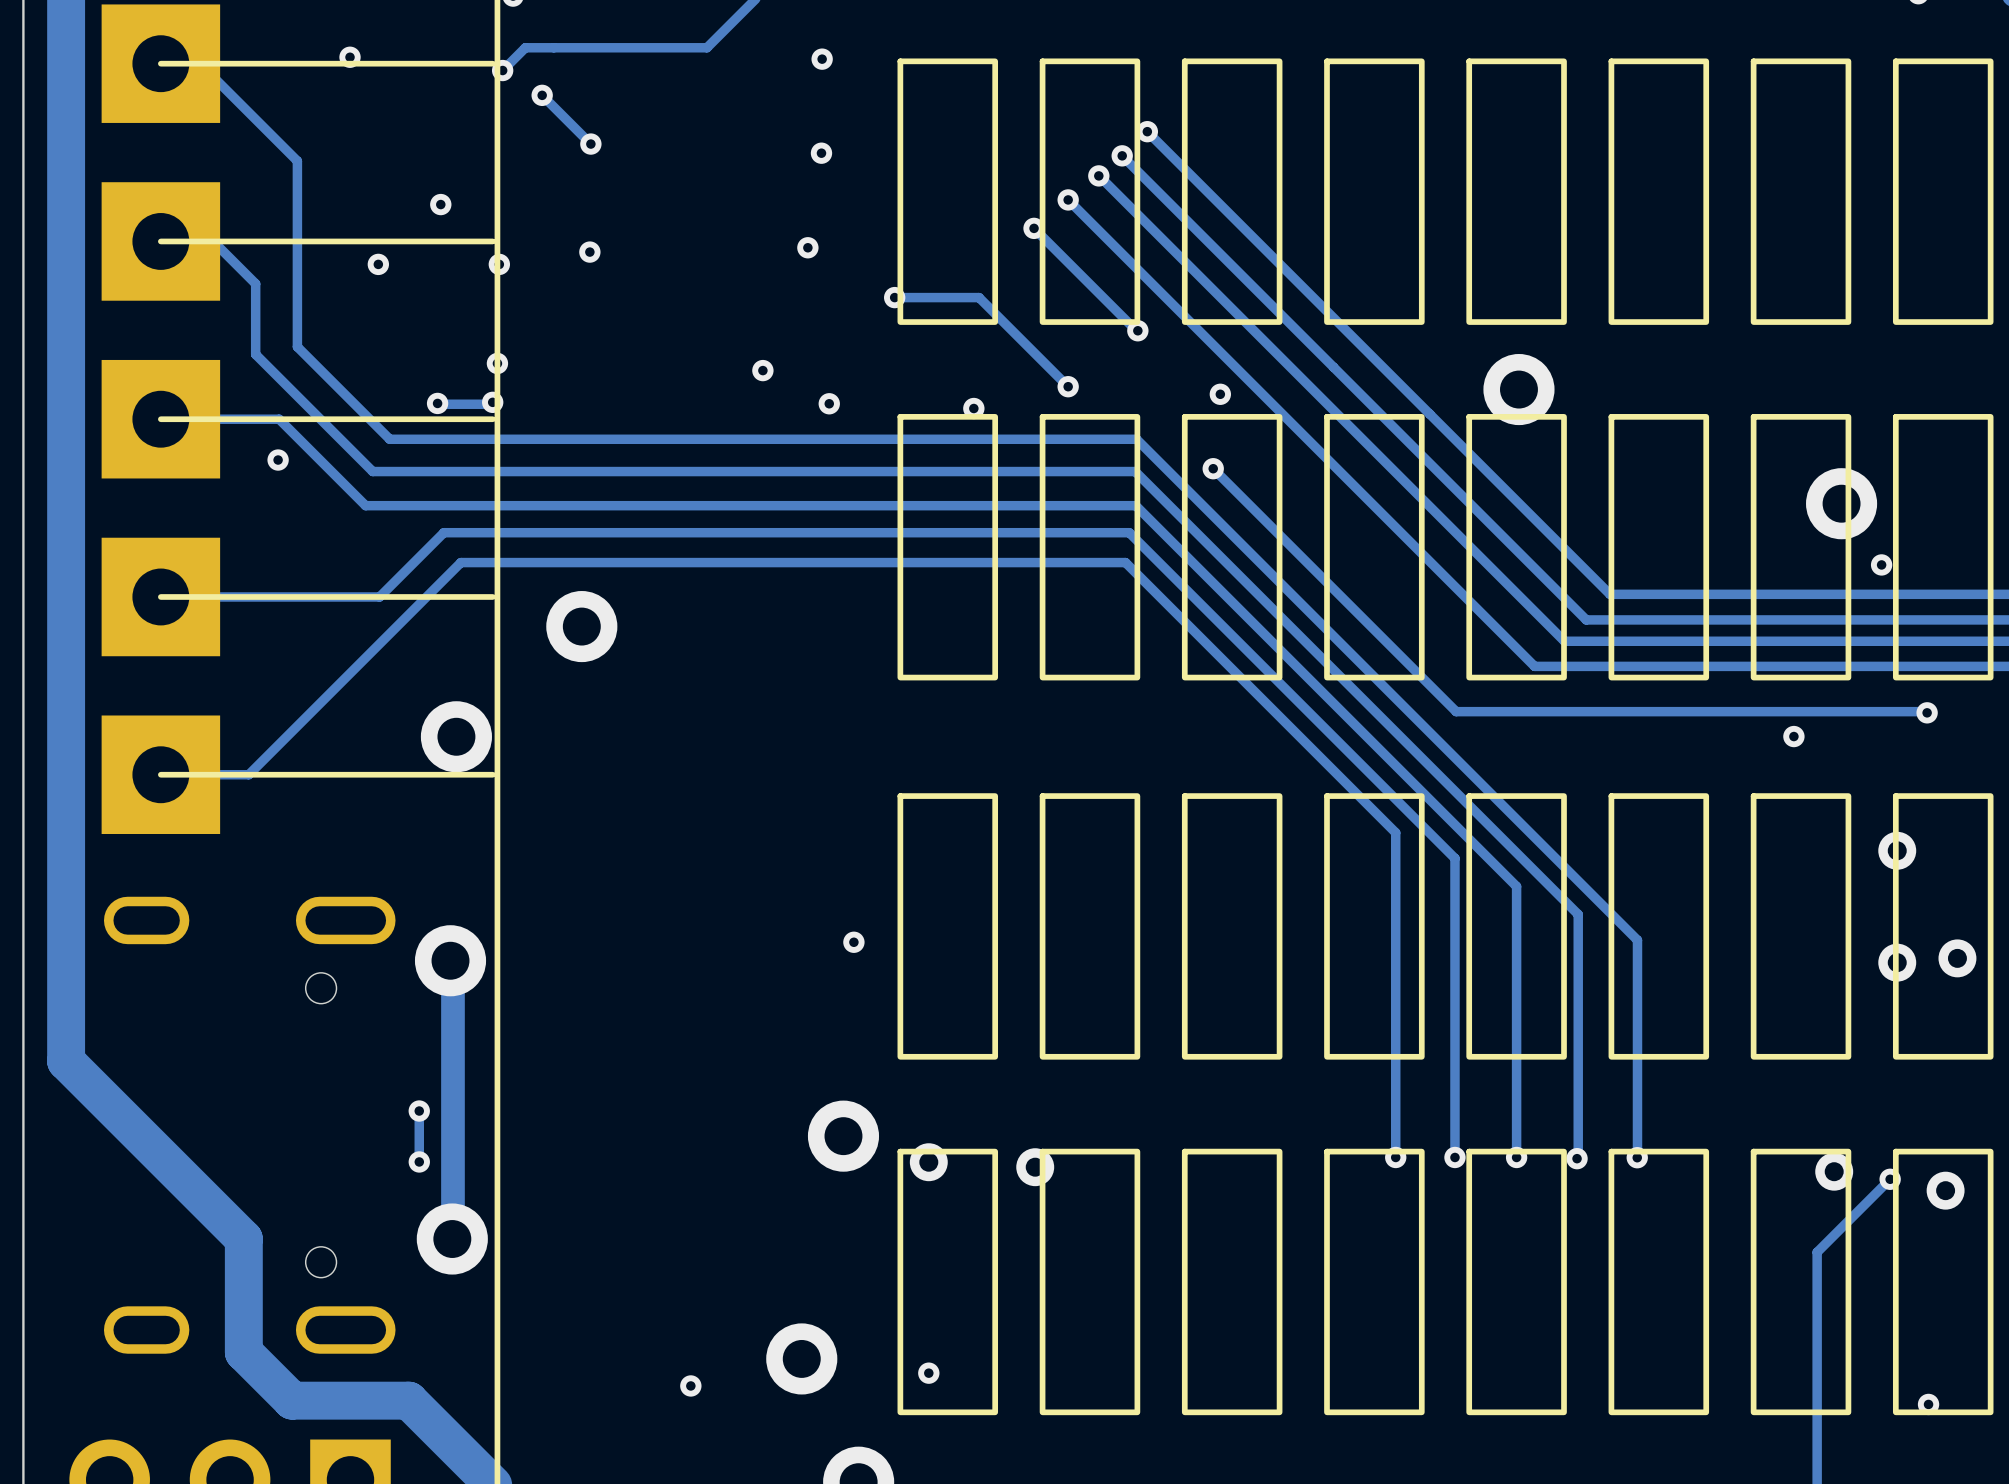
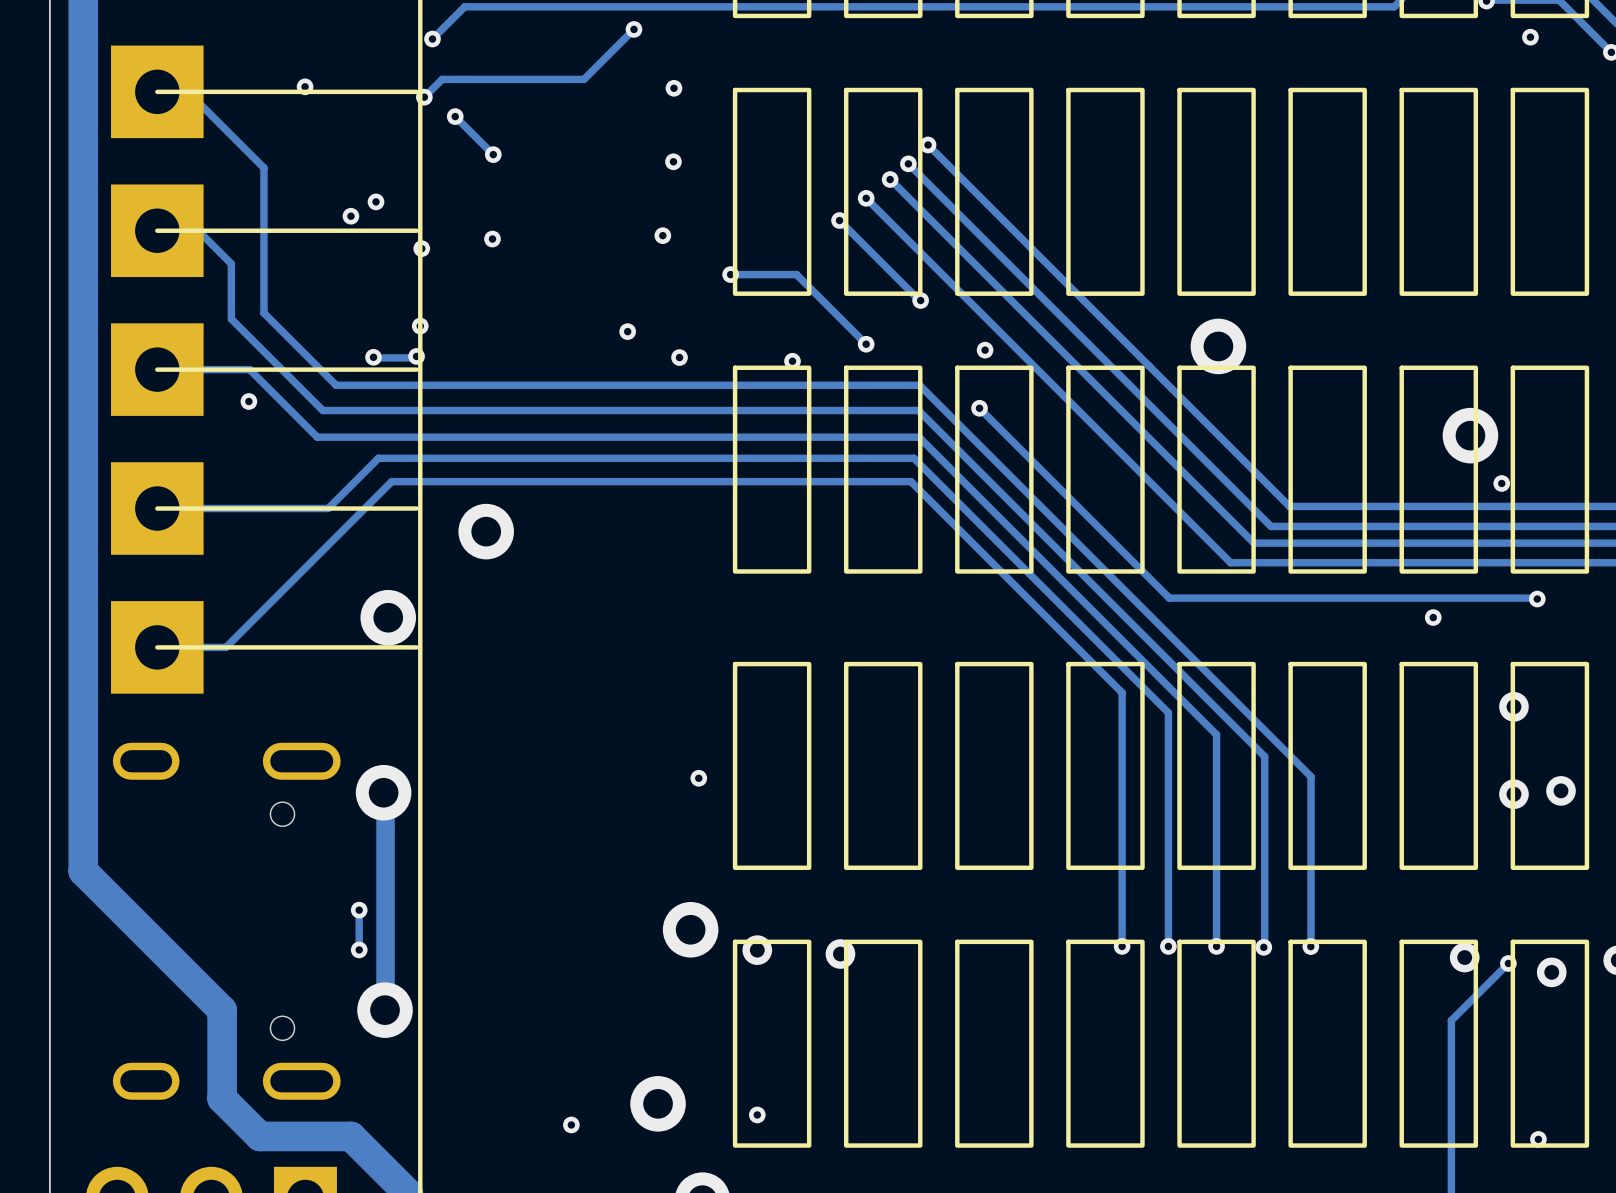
via position: (378, 264) -> (350, 216)

